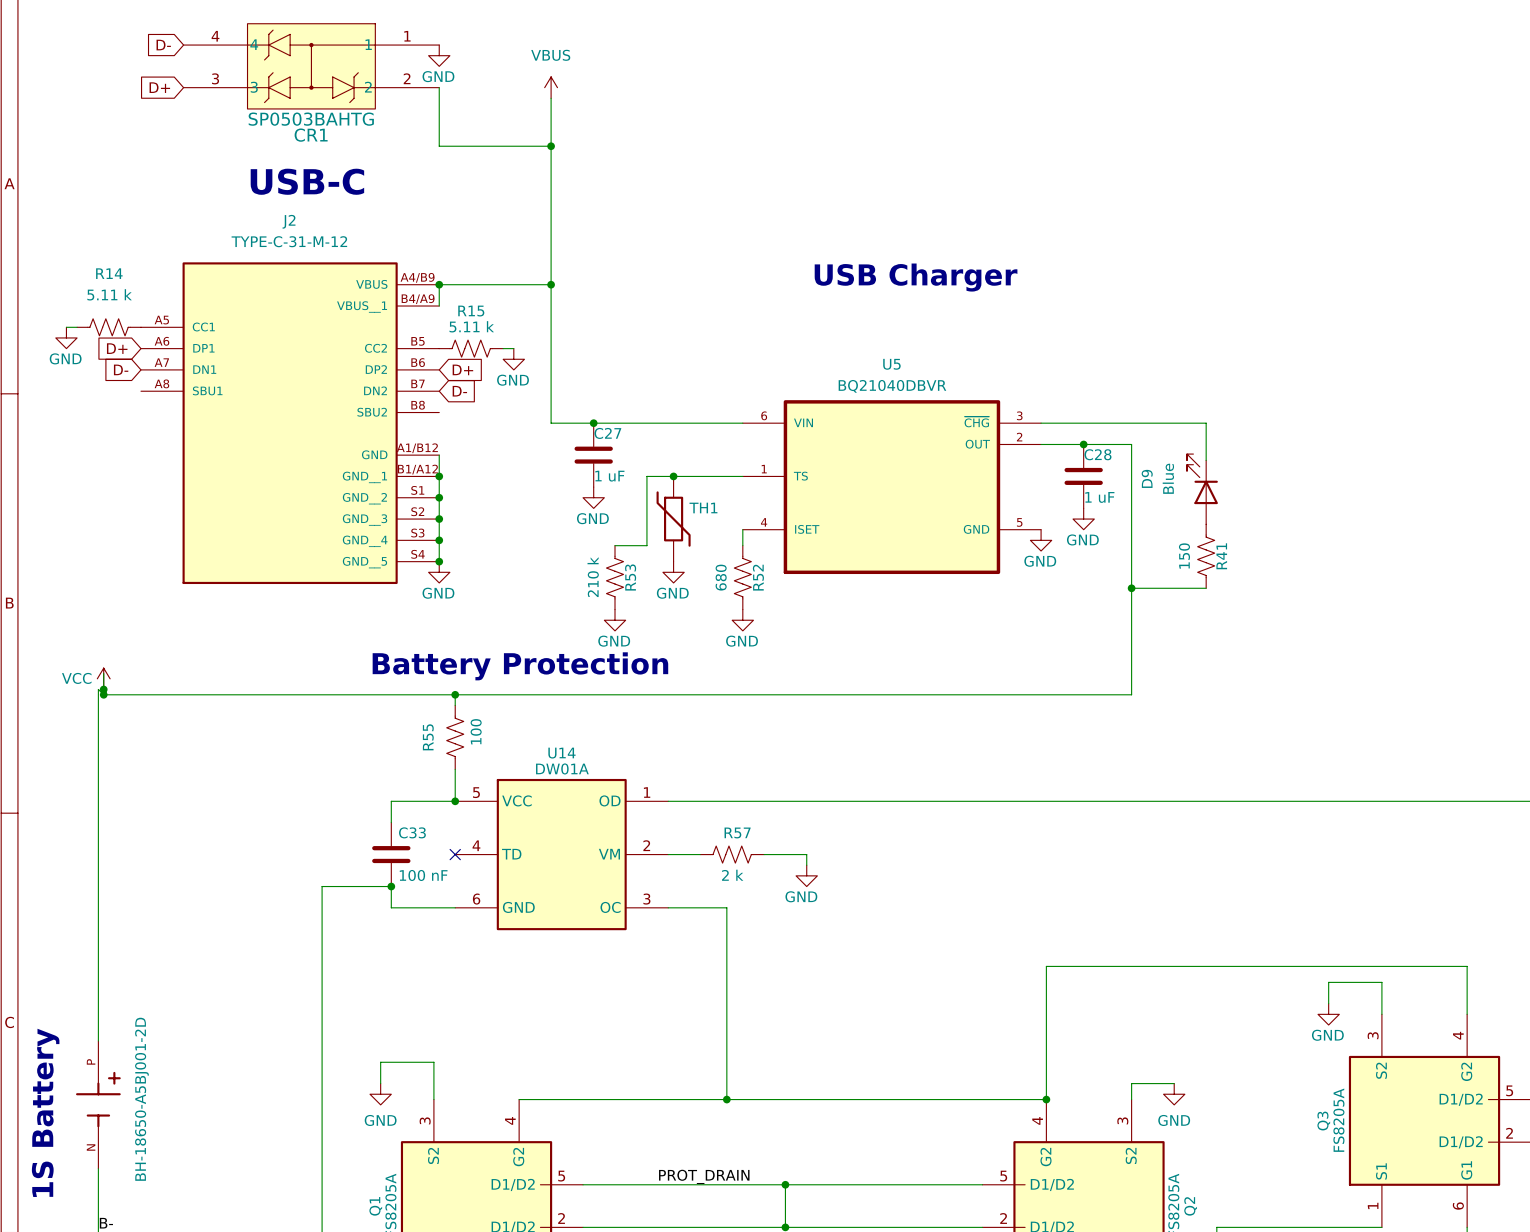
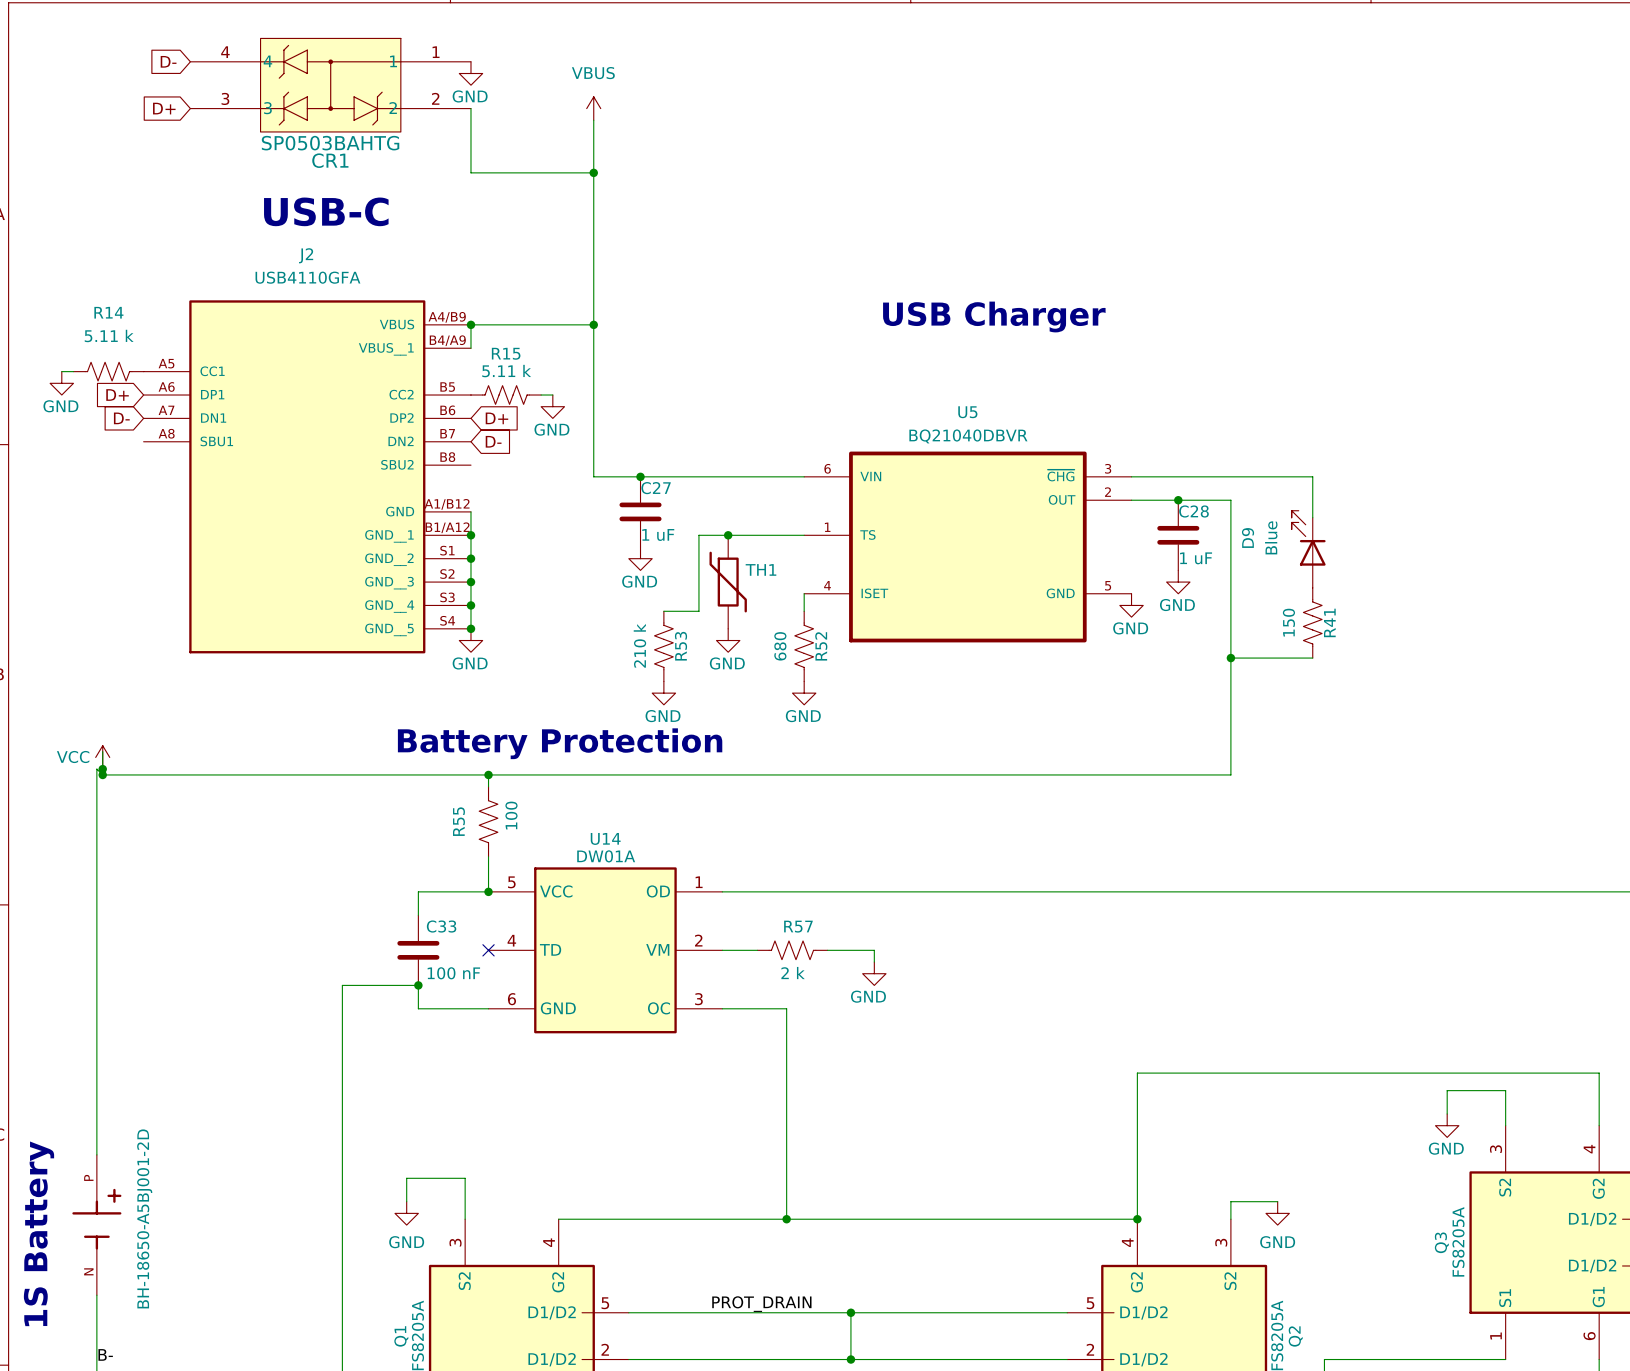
J2 value: TYPE-C-31-M-12 (289, 241) -> USB4110GFA (307, 277)

